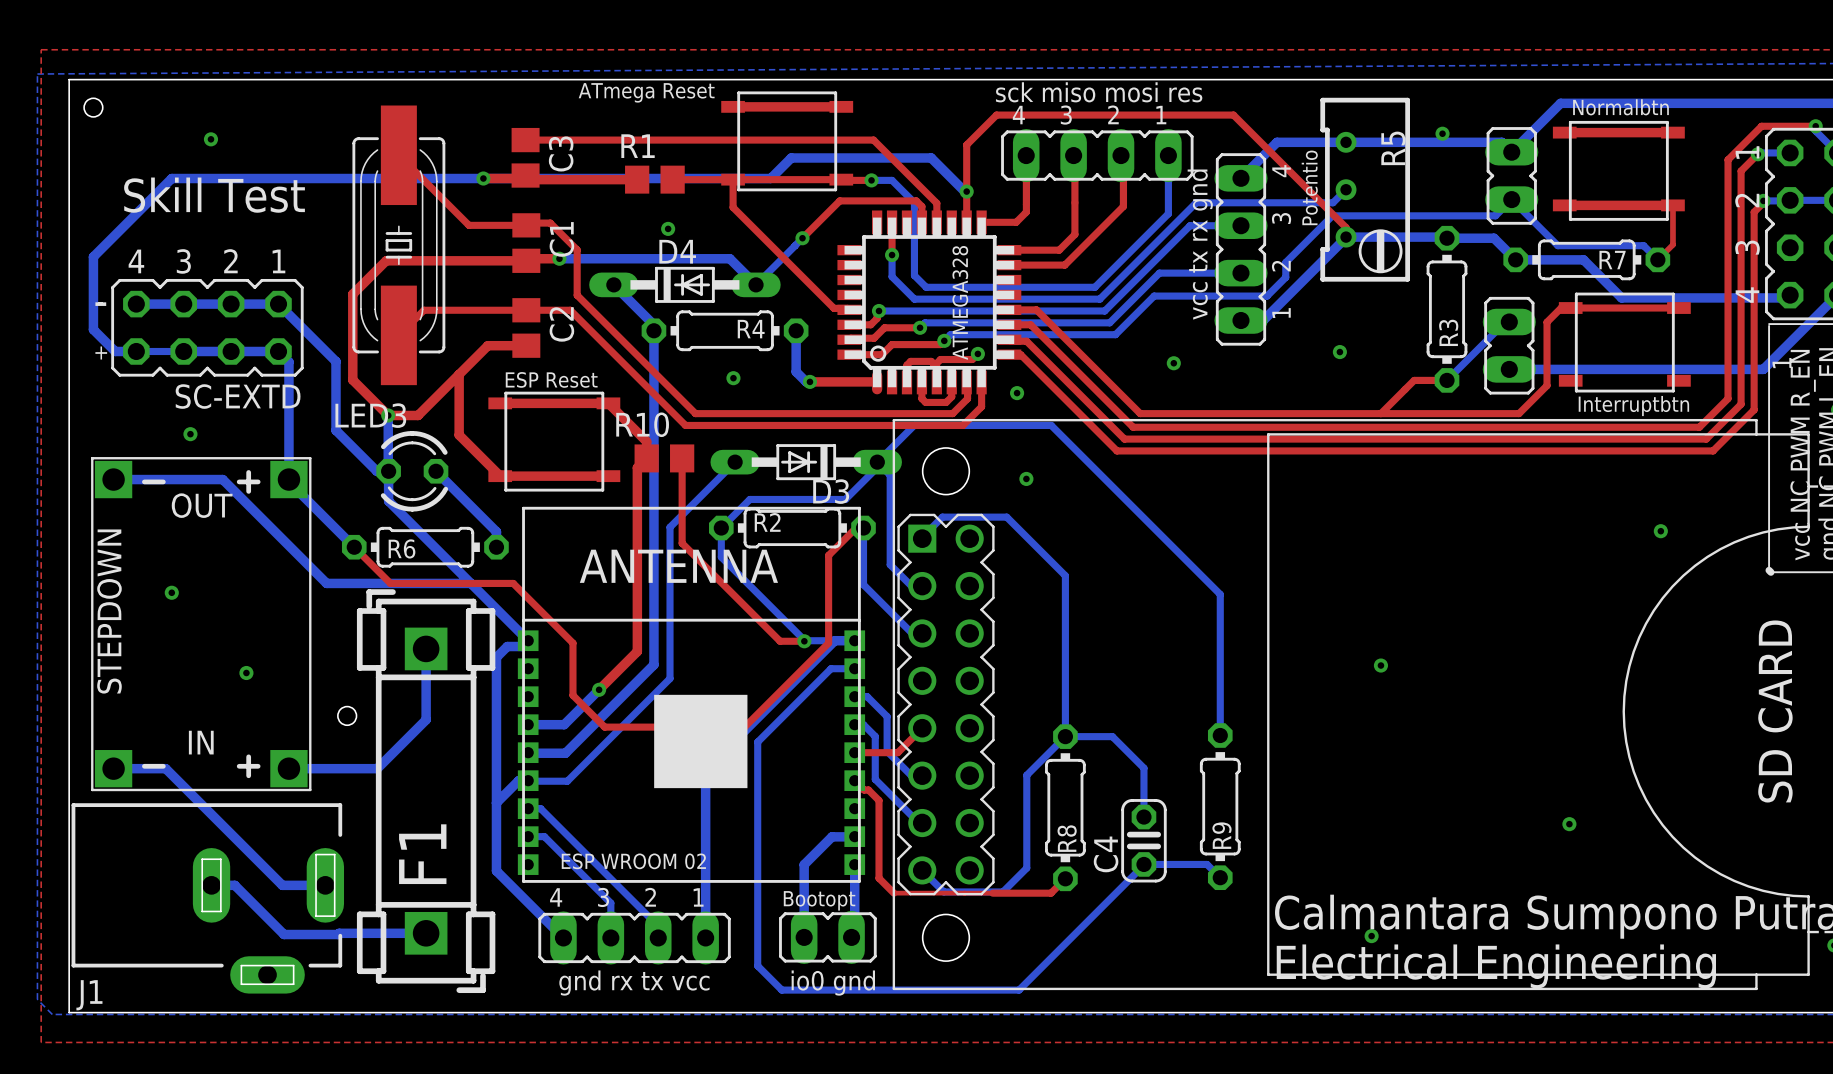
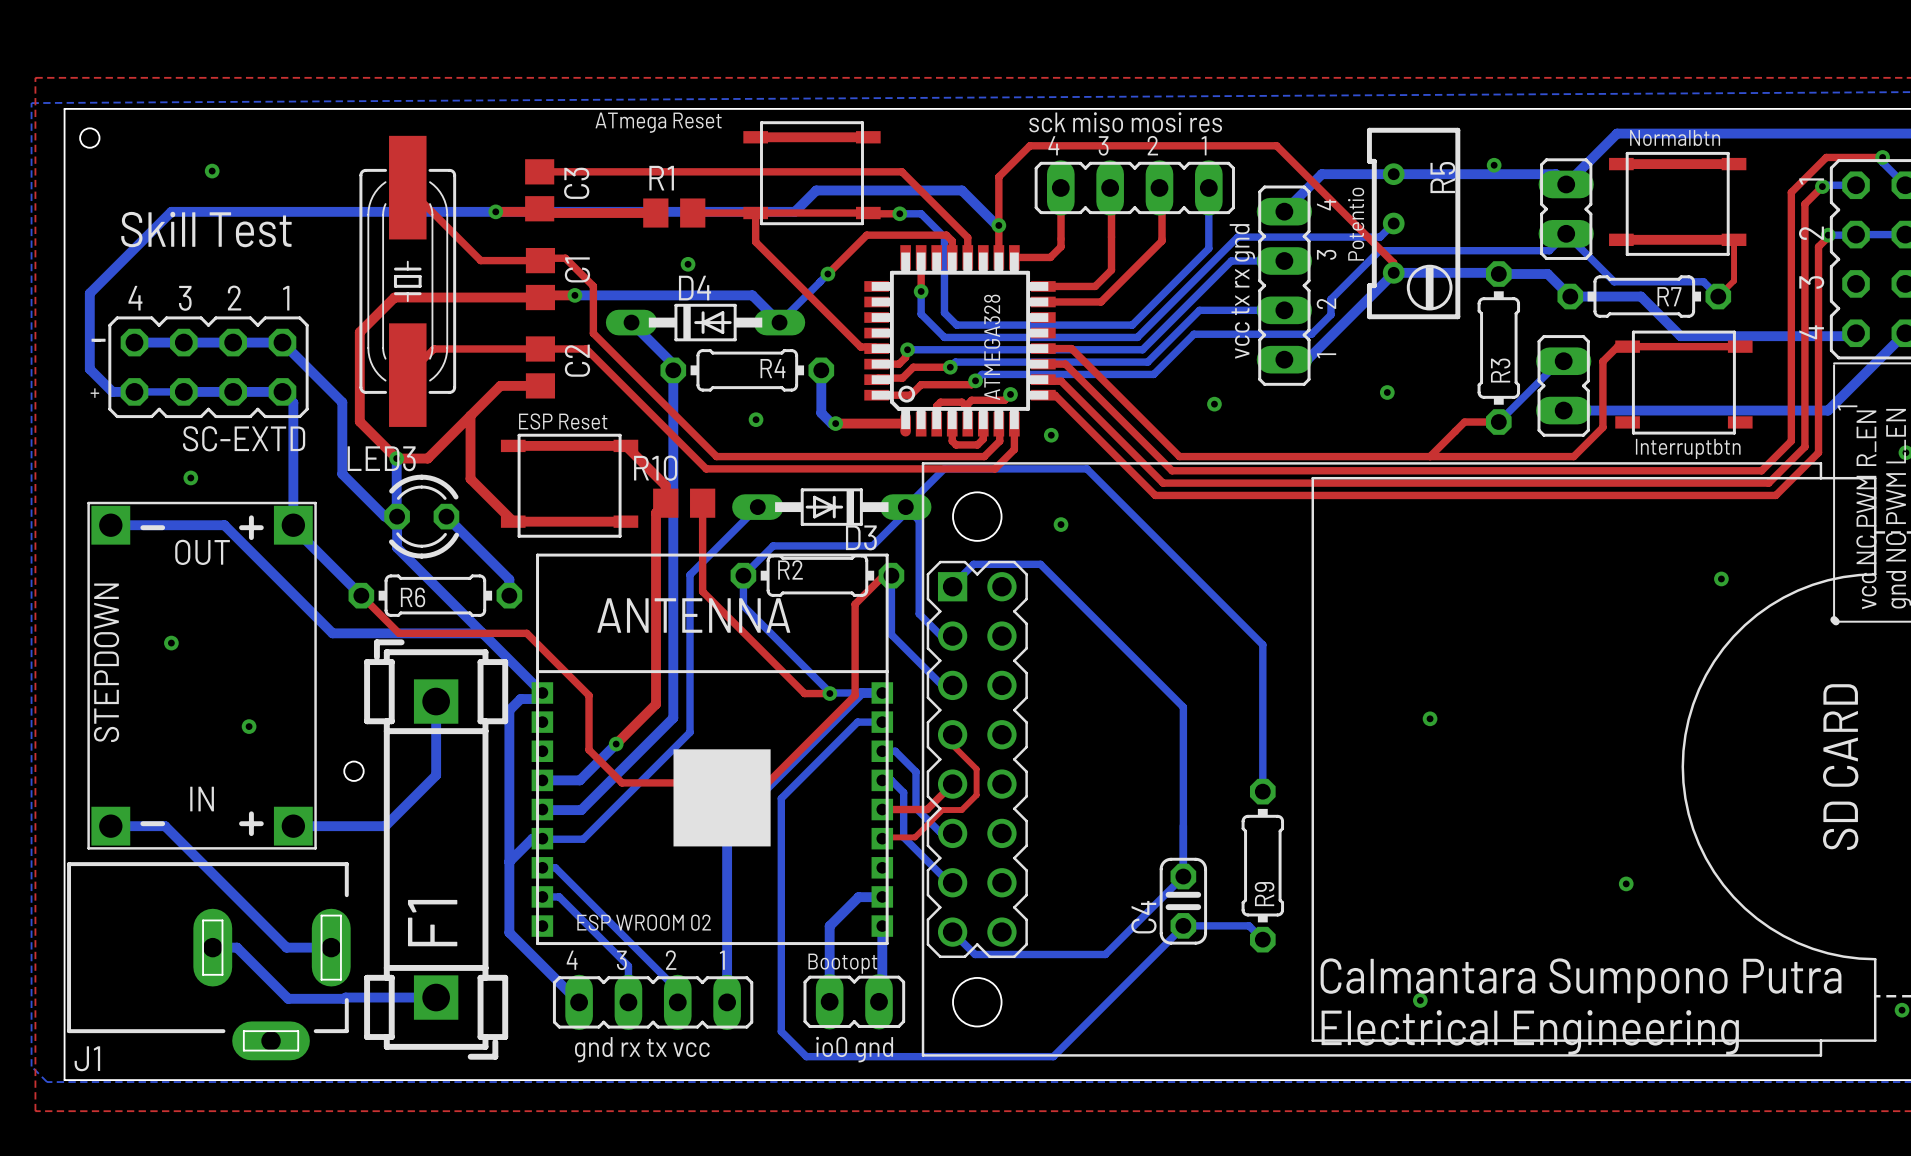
bottom track: (1065, 575) (1065, 736) -> (1101, 625) (1183, 707) (1183, 825)
top track: none -> (952, 734) (952, 745) (976, 769) (976, 795) (961, 810) (942, 810) (915, 837) (883, 837)
bottom track: (1065, 736) (1026, 775) (1026, 868) (1002, 891) -> (1183, 876) (1105, 954) (1036, 954)
bottom track: (1065, 736) (1112, 736) (1143, 768) -> none
top track: (854, 780) (879, 800) (879, 878) (893, 893) (1051, 893) (1065, 878) -> none
R8: (1065, 807) -> none

